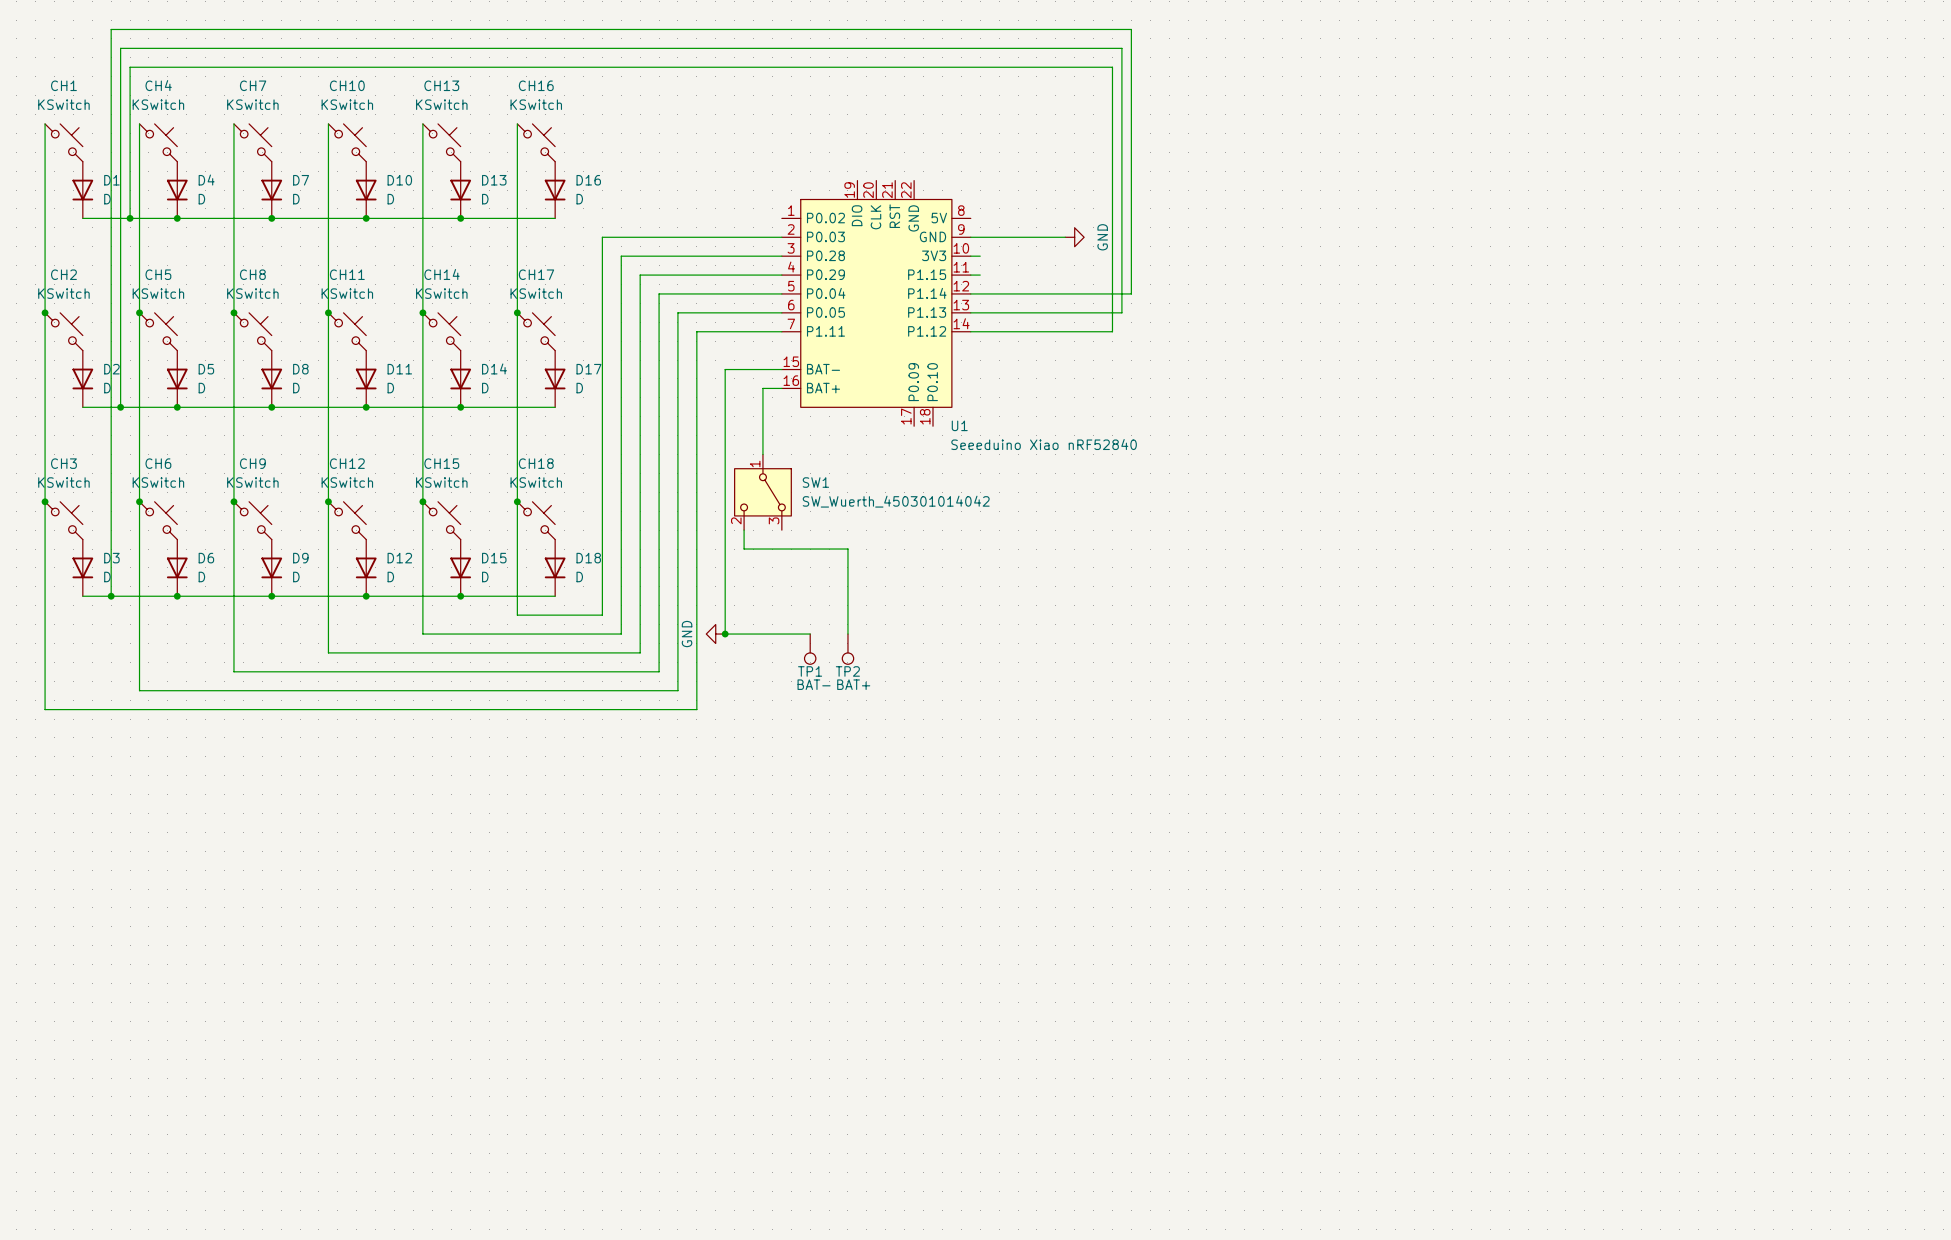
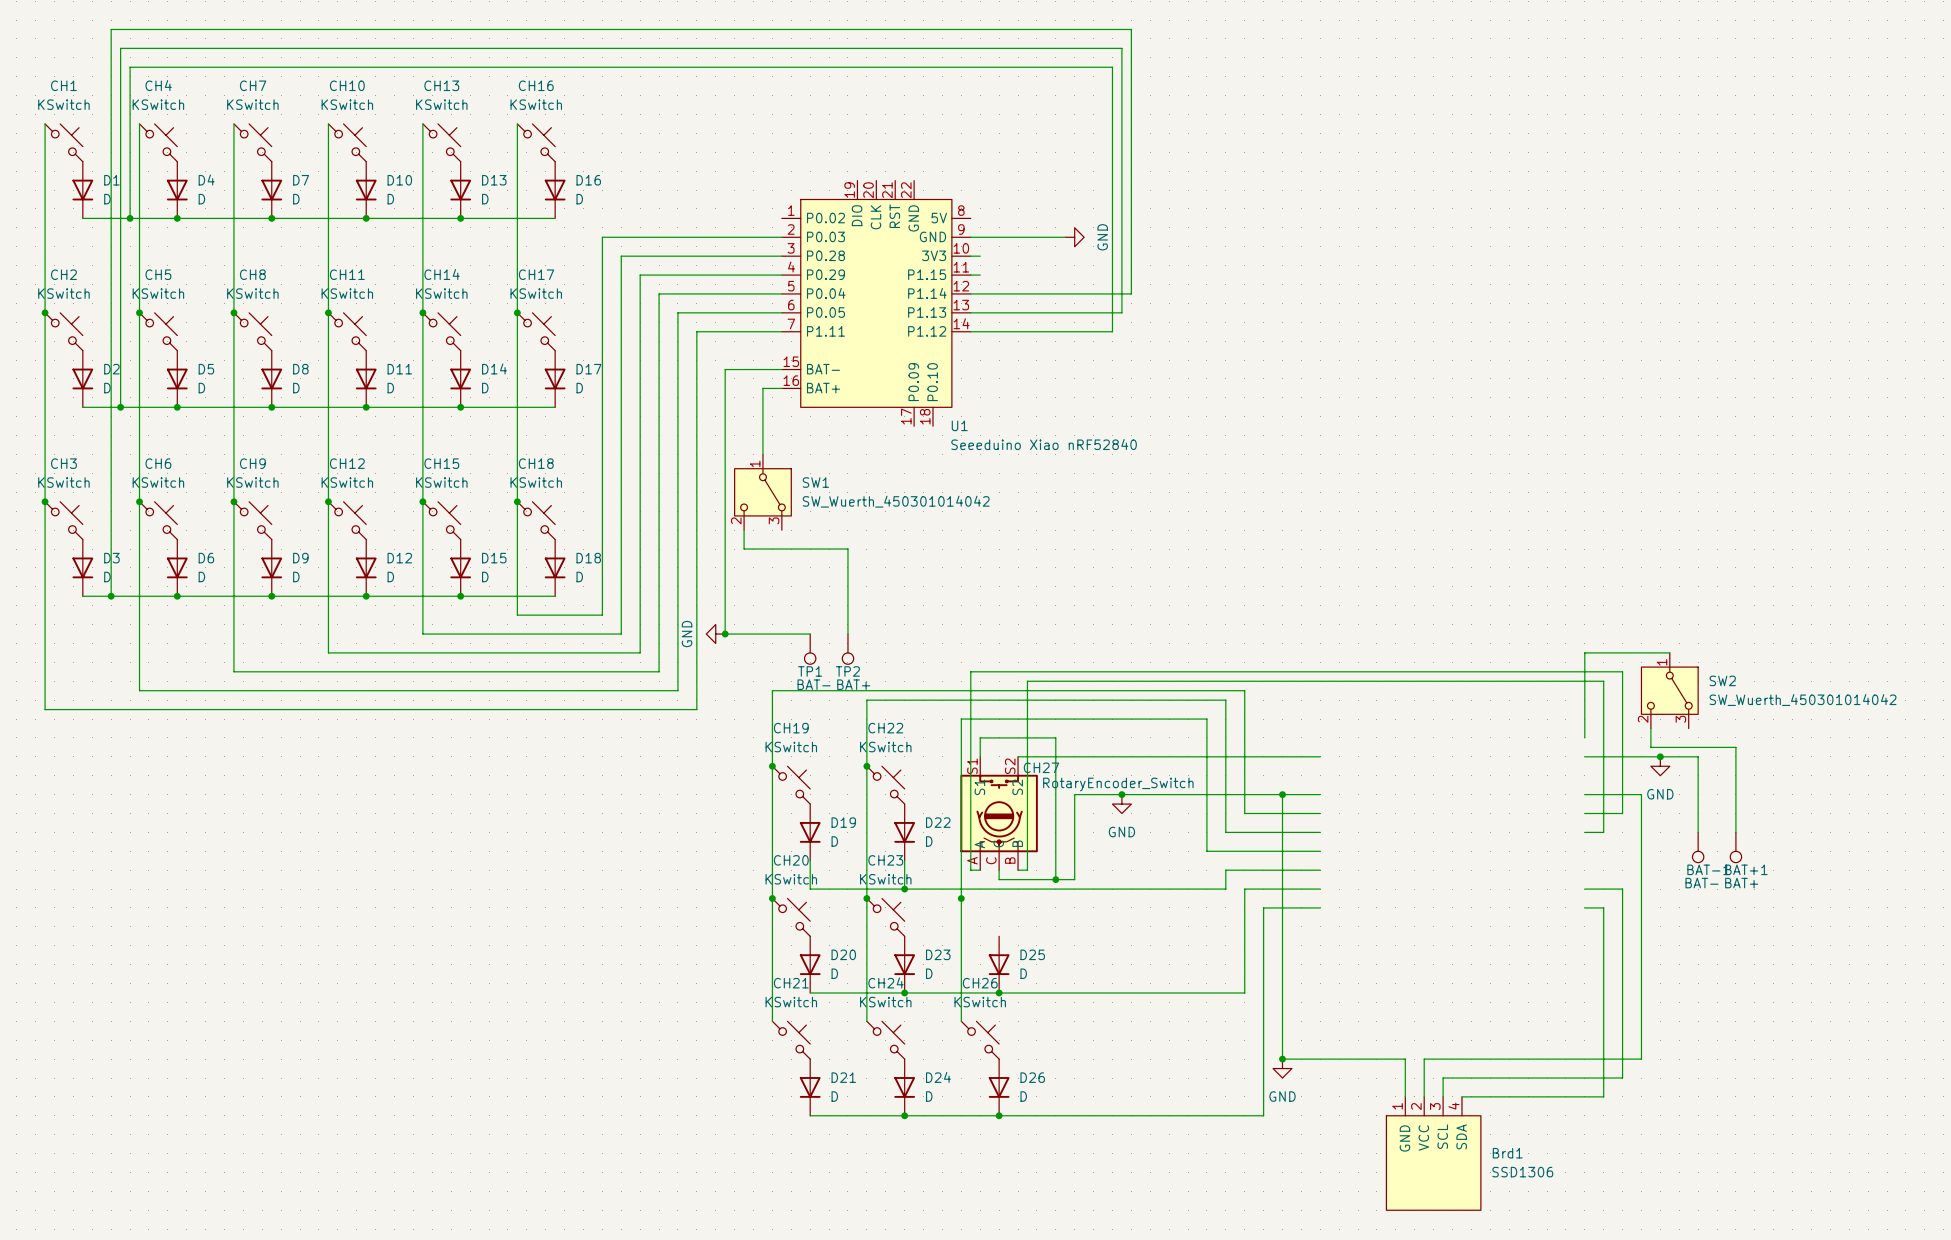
wire: none -> (1669, 652) (1584, 652) (1584, 737)
SW2: none -> SW_Wuerth_450301014042 (1669, 690)
wire: none -> (1650, 728) (1650, 747) (1735, 747) (1735, 832)
wire: none -> (980, 756) (980, 737) (1055, 737) (1055, 879)
wire: none -> (1018, 756) (1320, 756)
wire: none -> (1584, 756) (1698, 756) (1698, 832)
junction: none -> (1660, 756)
junction: none -> (772, 766)
junction: none -> (866, 766)
power symbol: none -> GND (1660, 766)
CH19: none -> KSwitch (791, 785)
CH22: none -> KSwitch (885, 785)
junction: none -> (1121, 794)
wire: none -> (1282, 794) (1282, 1059) (1405, 1059) (1405, 1096)
junction: none -> (1282, 794)
wire: none -> (1320, 794) (1074, 794) (1074, 879) (999, 879) (999, 870)
wire: none -> (1584, 794) (1641, 794) (1641, 1059) (1424, 1059) (1424, 1096)
power symbol: none -> GND (1121, 804)
CH27: none -> RotaryEncoder_Switch (999, 813)
wire: none -> (1320, 813) (1244, 813) (1244, 690) (772, 690) (772, 1021)
wire: none -> (1584, 813) (1622, 813) (1622, 671) (970, 671) (970, 870) (980, 870)
D19: none -> D (810, 832)
D22: none -> D (904, 832)
wire: none -> (1320, 832) (1225, 832) (1225, 700) (866, 700) (866, 1021)
wire: none -> (1584, 832) (1603, 832) (1603, 681) (1027, 681) (1027, 870) (1018, 870)
BAT-1: none -> BAT- (1698, 847)
BAT+1: none -> BAT+ (1735, 847)
wire: none -> (1320, 851) (1206, 851) (1206, 719) (961, 719) (961, 1021)
wire: none -> (810, 860) (810, 889) (1225, 889) (1225, 870) (1320, 870)
wire: none -> (904, 860) (904, 889)
junction: none -> (1055, 879)
junction: none -> (904, 889)
wire: none -> (1320, 889) (1244, 889) (1244, 992) (810, 992)
wire: none -> (1584, 889) (1622, 889) (1622, 1078) (1443, 1078) (1443, 1096)
junction: none -> (772, 898)
junction: none -> (866, 898)
junction: none -> (961, 898)
wire: none -> (1320, 907) (1263, 907) (1263, 1115) (810, 1115)
wire: none -> (1584, 907) (1603, 907) (1603, 1096) (1461, 1096)
CH20: none -> KSwitch (791, 917)
CH23: none -> KSwitch (885, 917)
D20: none -> D (810, 964)
D23: none -> D (904, 964)
D25: none -> D (999, 964)
junction: none -> (904, 992)
junction: none -> (999, 992)
CH21: none -> KSwitch (791, 1040)
CH24: none -> KSwitch (885, 1040)
CH26: none -> KSwitch (980, 1040)
junction: none -> (1282, 1059)
power symbol: none -> GND (1282, 1068)
D21: none -> D (810, 1087)
D24: none -> D (904, 1087)
D26: none -> D (999, 1087)
junction: none -> (904, 1115)
junction: none -> (999, 1115)
Brd1: none -> SSD1306 (1433, 1153)

